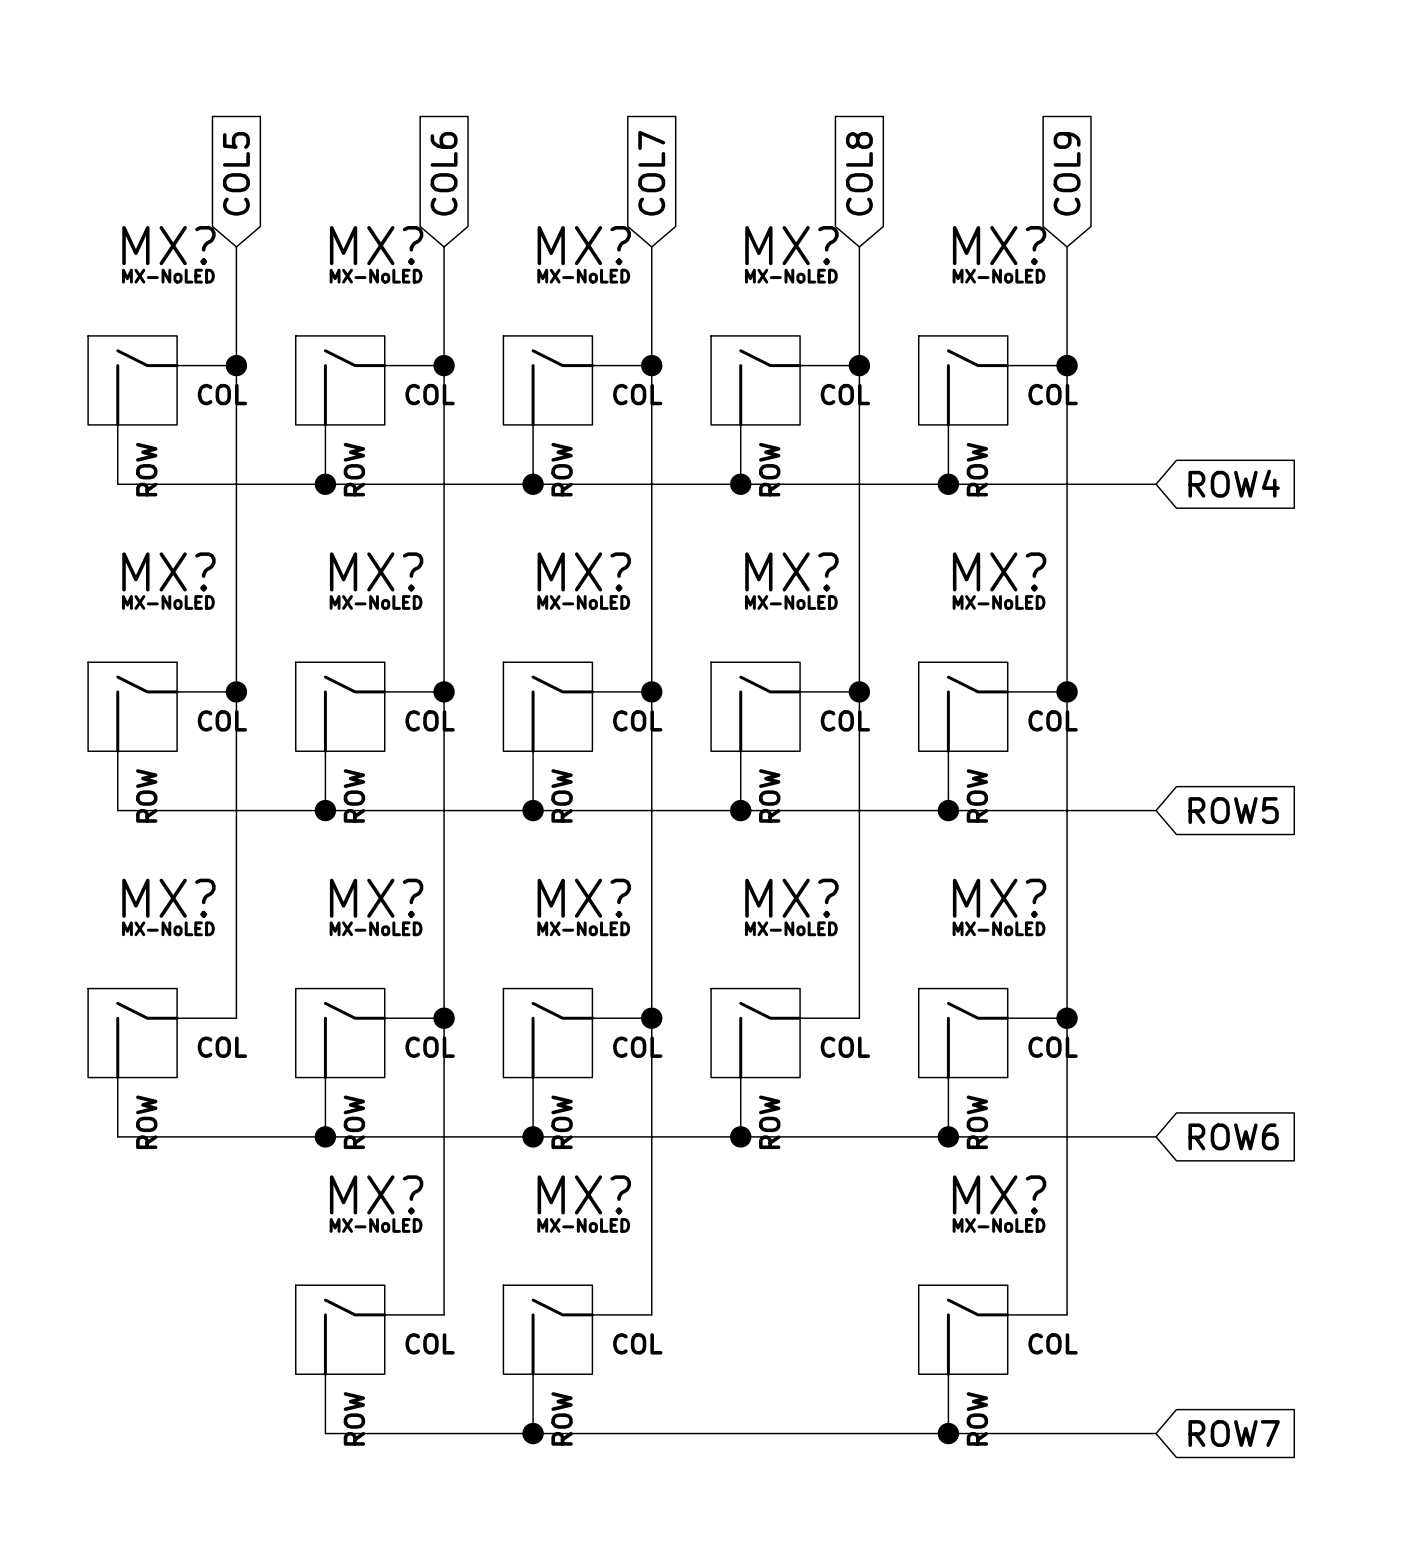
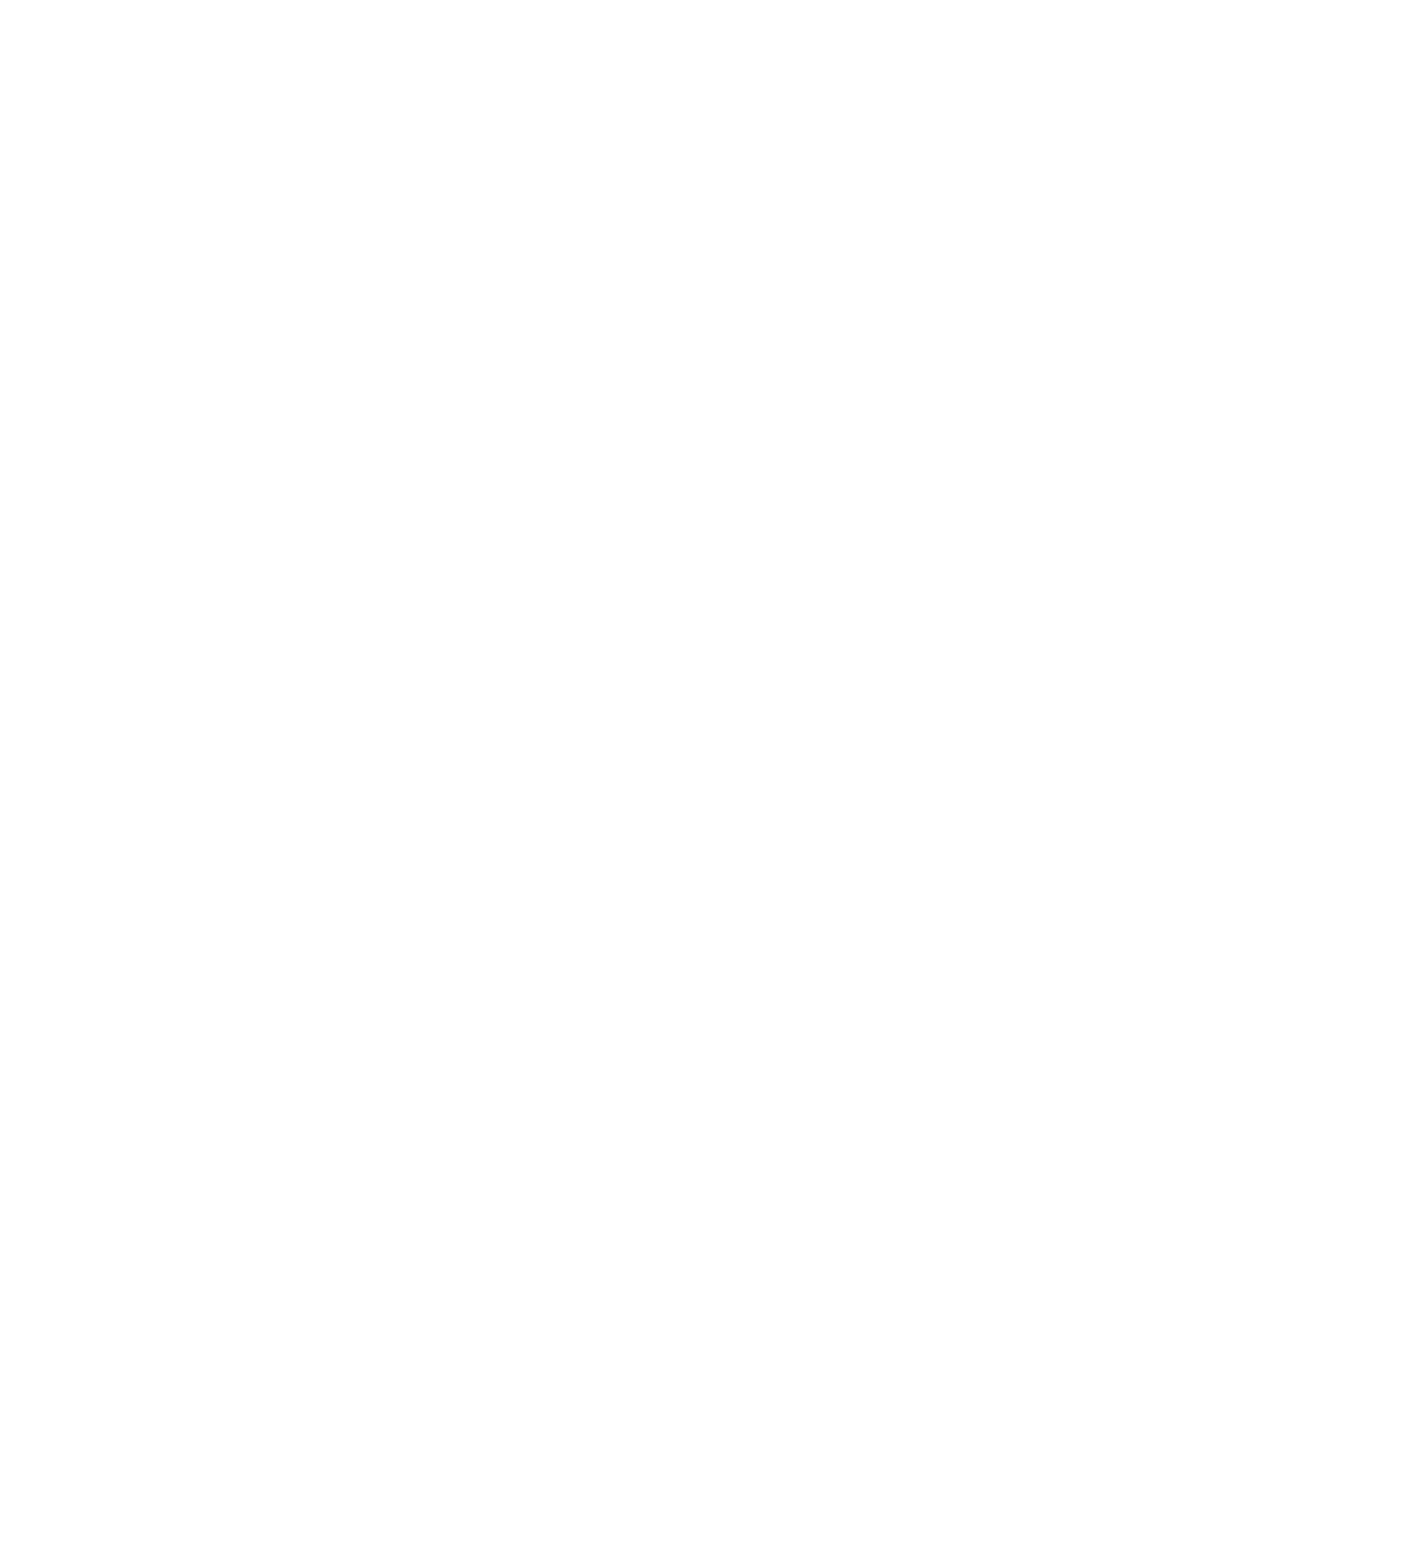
global label: COL5 (236, 173) -> none
global label: COL6 (444, 173) -> none
global label: COL7 (651, 173) -> none
global label: COL8 (859, 173) -> none
global label: COL9 (1067, 173) -> none
wire: (236, 246) (236, 1018) -> none
wire: (444, 246) (444, 1314) -> none
wire: (651, 246) (651, 1314) -> none
wire: (859, 246) (859, 1018) -> none
wire: (1067, 246) (1067, 1314) -> none
junction: (236, 365) -> none
junction: (444, 365) -> none
junction: (651, 365) -> none
junction: (859, 365) -> none
junction: (1067, 365) -> none
MX?: MX-NoLED (162, 410) -> none
MX?: MX-NoLED (369, 410) -> none
MX?: MX-NoLED (577, 410) -> none
MX?: MX-NoLED (785, 410) -> none
MX?: MX-NoLED (992, 410) -> none
global label: ROW4 (1234, 483) -> none
wire: (117, 484) (1156, 484) -> none
junction: (325, 484) -> none
junction: (533, 484) -> none
junction: (740, 484) -> none
junction: (948, 484) -> none
junction: (236, 691) -> none
junction: (444, 691) -> none
junction: (651, 691) -> none
junction: (859, 691) -> none
junction: (1067, 691) -> none
MX?: MX-NoLED (162, 736) -> none
MX?: MX-NoLED (369, 736) -> none
MX?: MX-NoLED (577, 736) -> none
MX?: MX-NoLED (785, 736) -> none
MX?: MX-NoLED (992, 736) -> none
wire: (117, 810) (1156, 810) -> none
junction: (325, 810) -> none
junction: (533, 810) -> none
junction: (740, 810) -> none
junction: (948, 810) -> none
global label: ROW5 (1233, 810) -> none
junction: (444, 1018) -> none
junction: (651, 1018) -> none
junction: (1067, 1018) -> none
MX?: MX-NoLED (162, 1062) -> none
MX?: MX-NoLED (369, 1062) -> none
MX?: MX-NoLED (577, 1062) -> none
MX?: MX-NoLED (785, 1062) -> none
MX?: MX-NoLED (992, 1062) -> none
wire: (117, 1136) (1156, 1136) -> none
junction: (325, 1136) -> none
junction: (533, 1136) -> none
junction: (740, 1136) -> none
junction: (948, 1136) -> none
global label: ROW6 (1233, 1136) -> none
MX?: MX-NoLED (369, 1359) -> none
MX?: MX-NoLED (577, 1359) -> none
MX?: MX-NoLED (992, 1359) -> none
wire: (325, 1433) (1156, 1433) -> none
junction: (533, 1433) -> none
junction: (948, 1433) -> none
global label: ROW7 (1234, 1433) -> none

